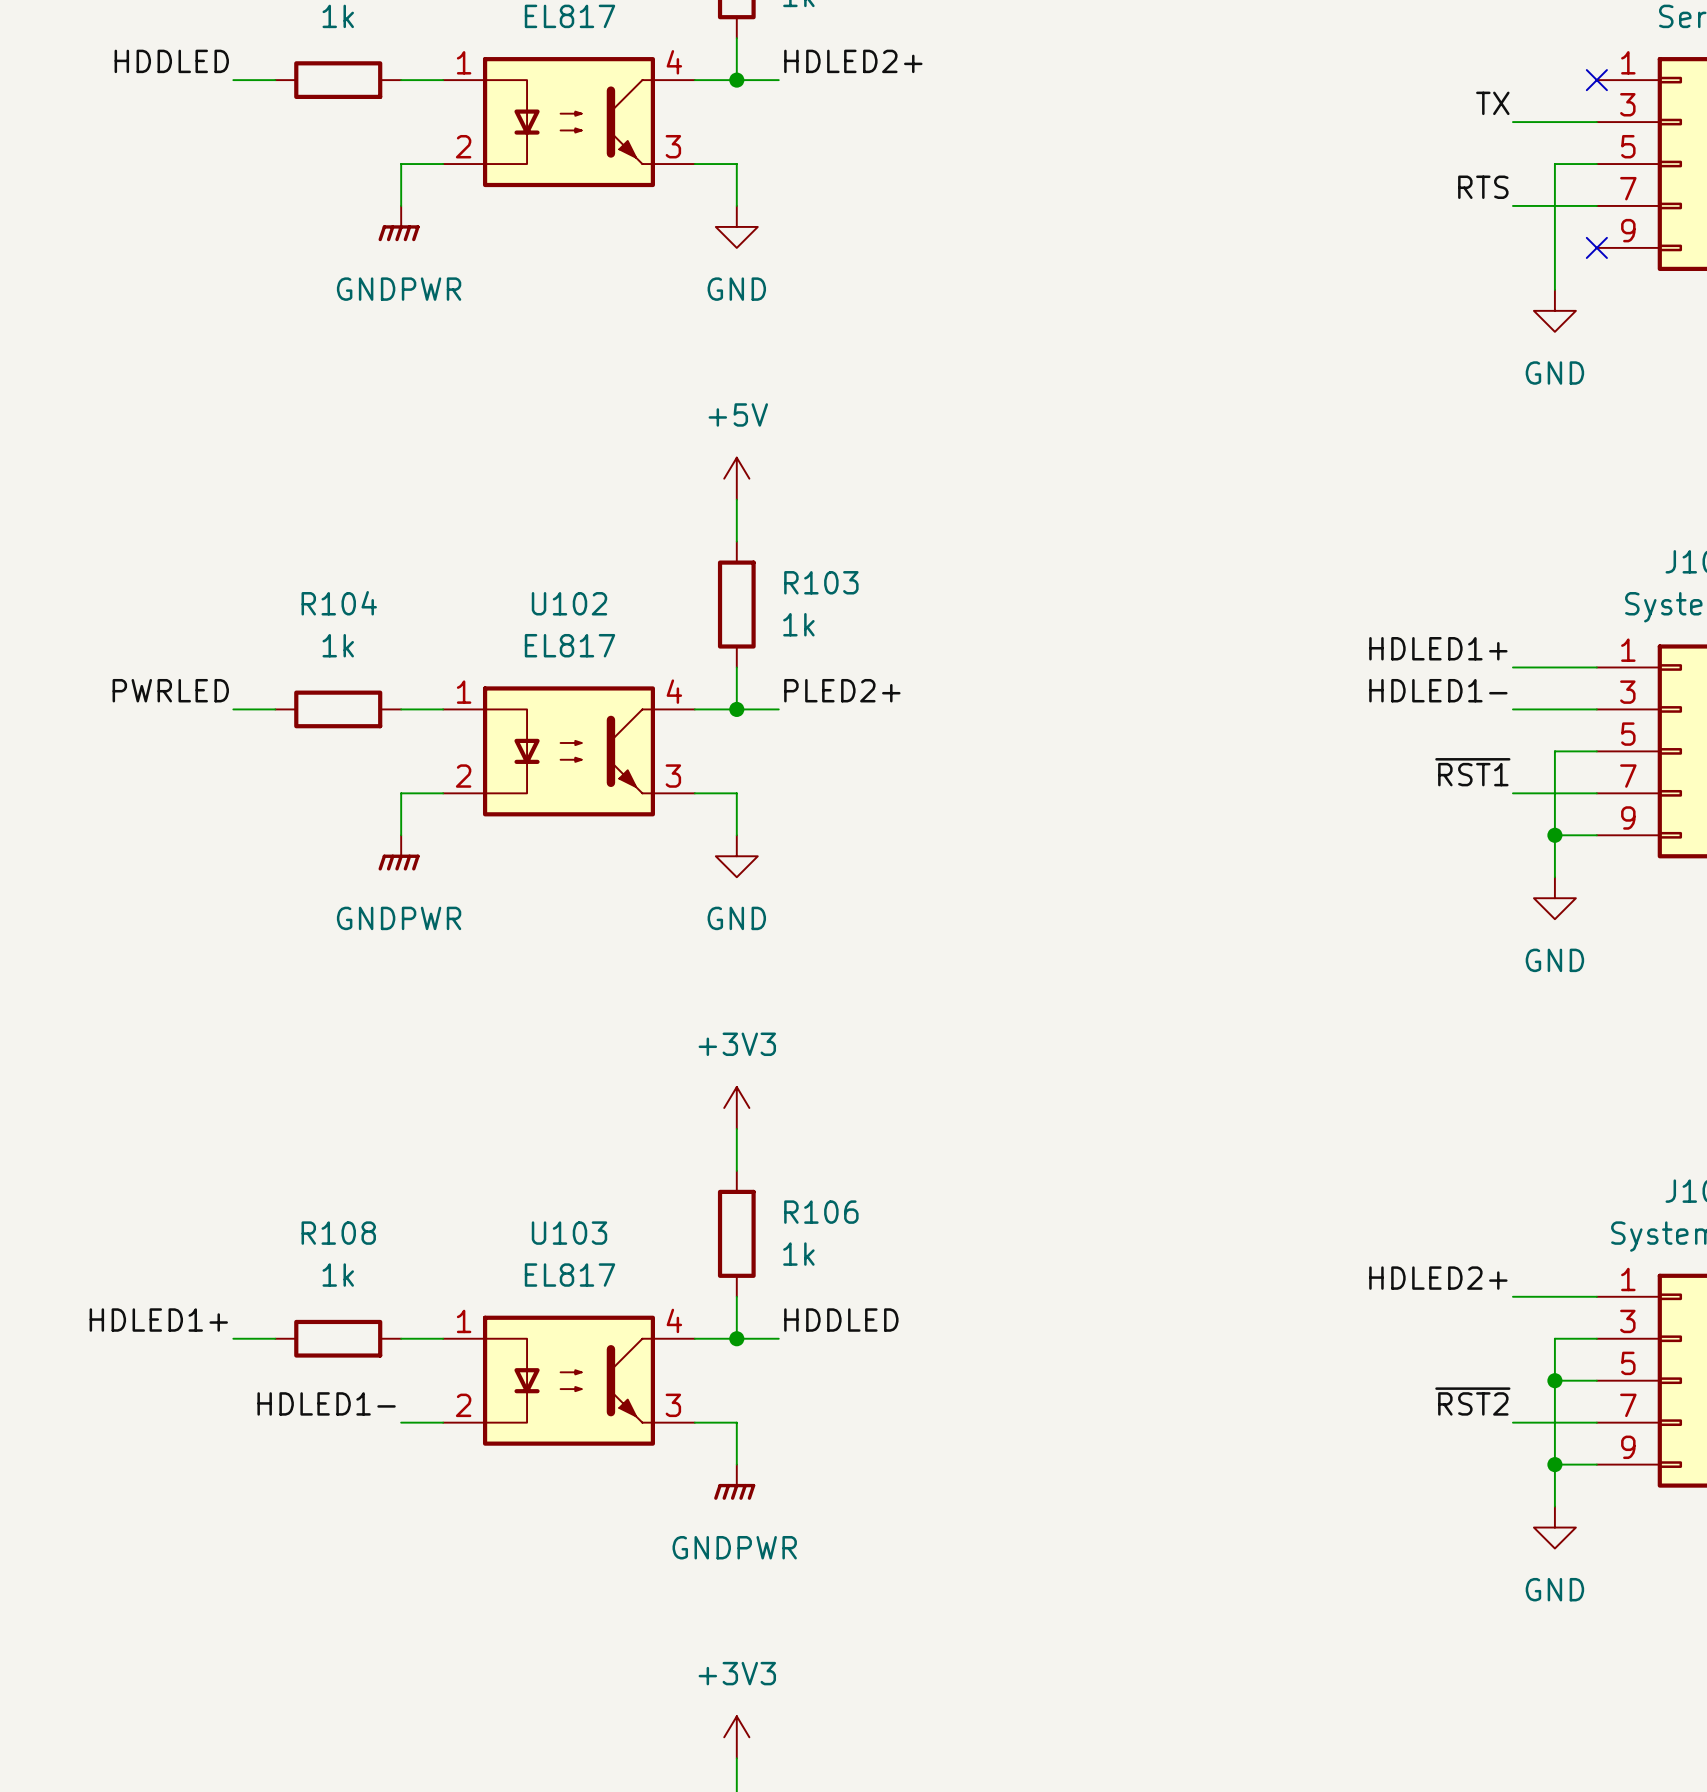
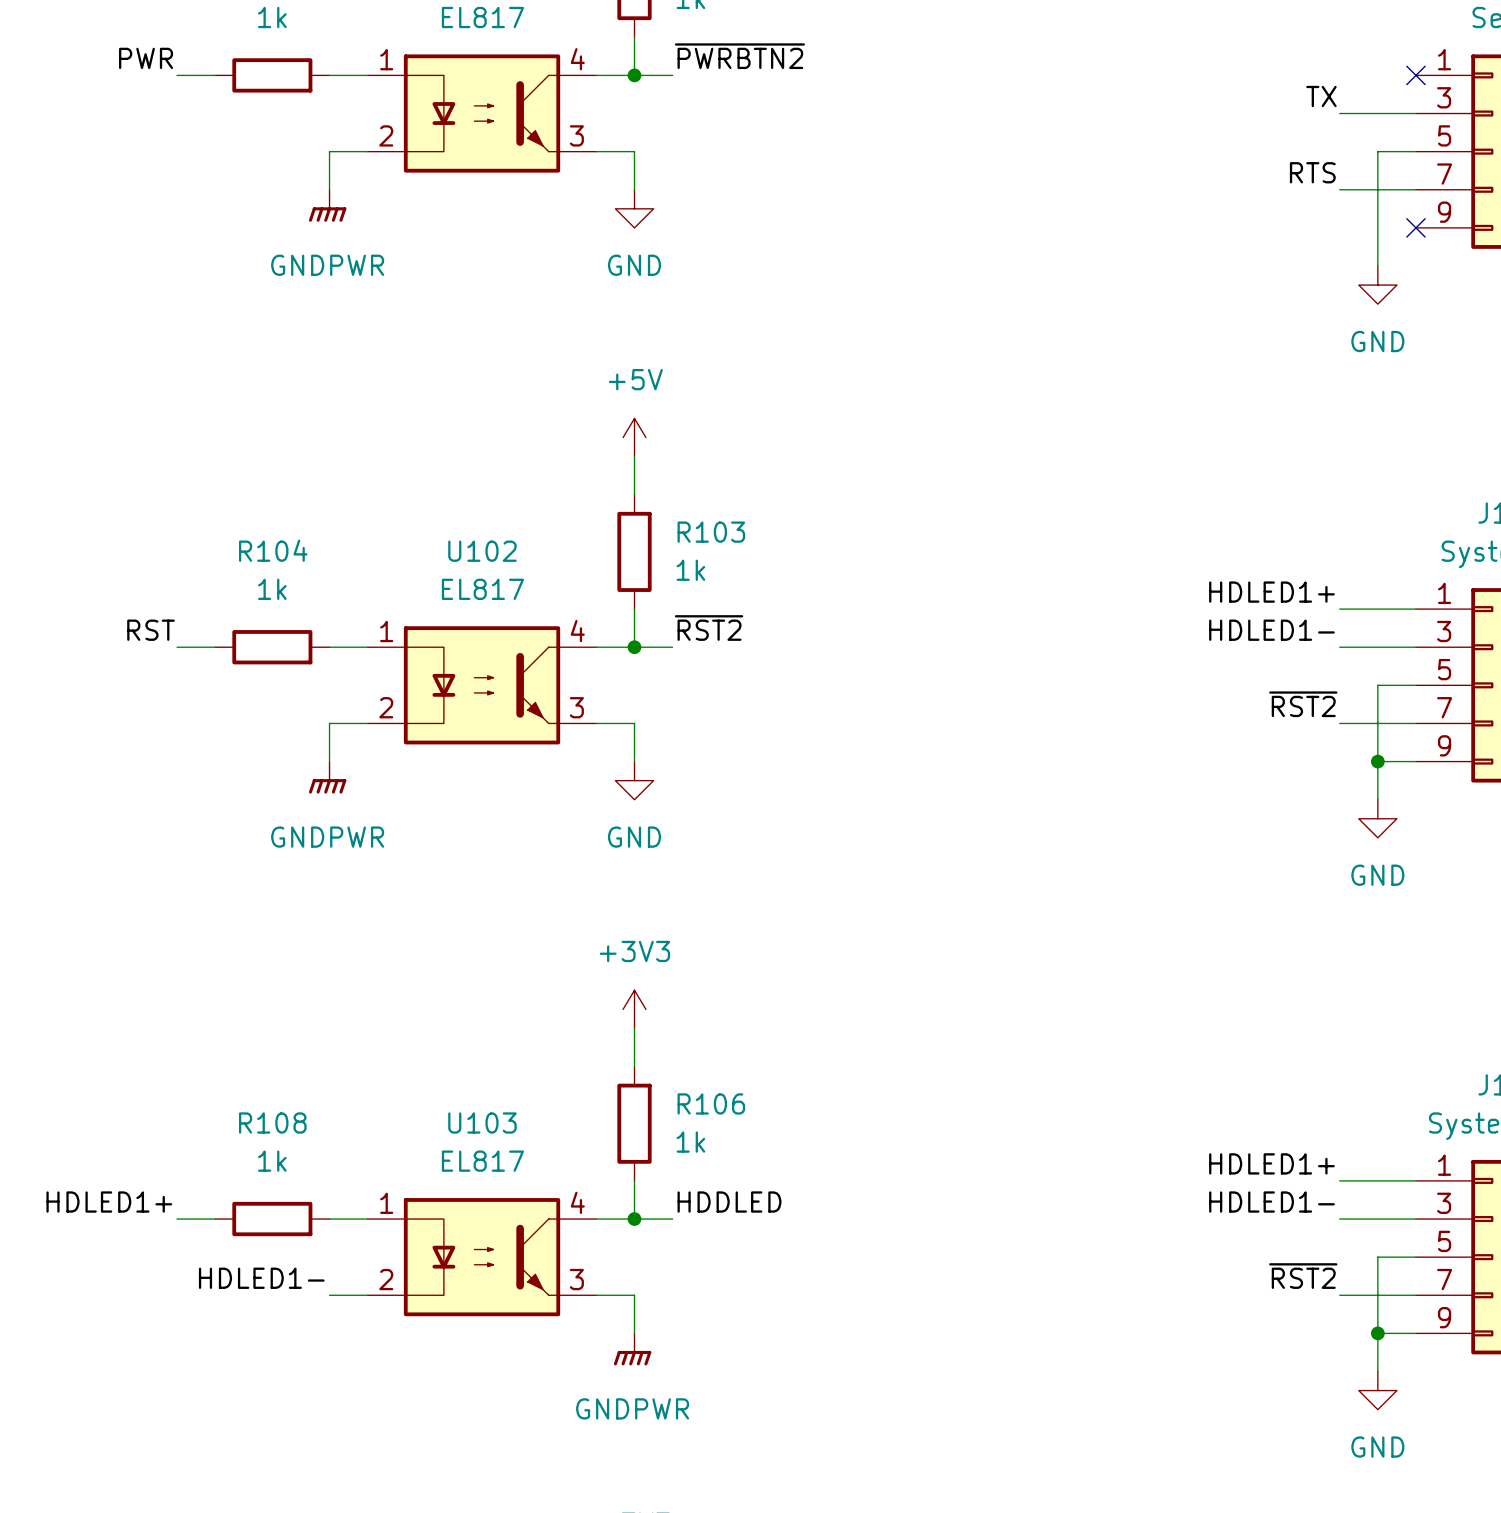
label: HDDLED (171, 61) -> PWR (146, 58)
label: HDLED2+ (853, 61) -> ~{PWRBTN2} (739, 56)
label: PWRLED (170, 690) -> RST (151, 630)
label: PLED2+ (842, 690) -> ~{RST2} (709, 628)
label: ~{RST1} (1472, 772) -> ~{RST2} (1303, 704)
label: HDLED2+ (1438, 1278) -> HDLED1+ (1271, 1163)
label: none -> HDLED1- (1271, 1202)
wire: (1554, 1338) (1554, 1380) -> (1377, 1219) (1339, 1219)
junction: (1554, 1380) -> none

